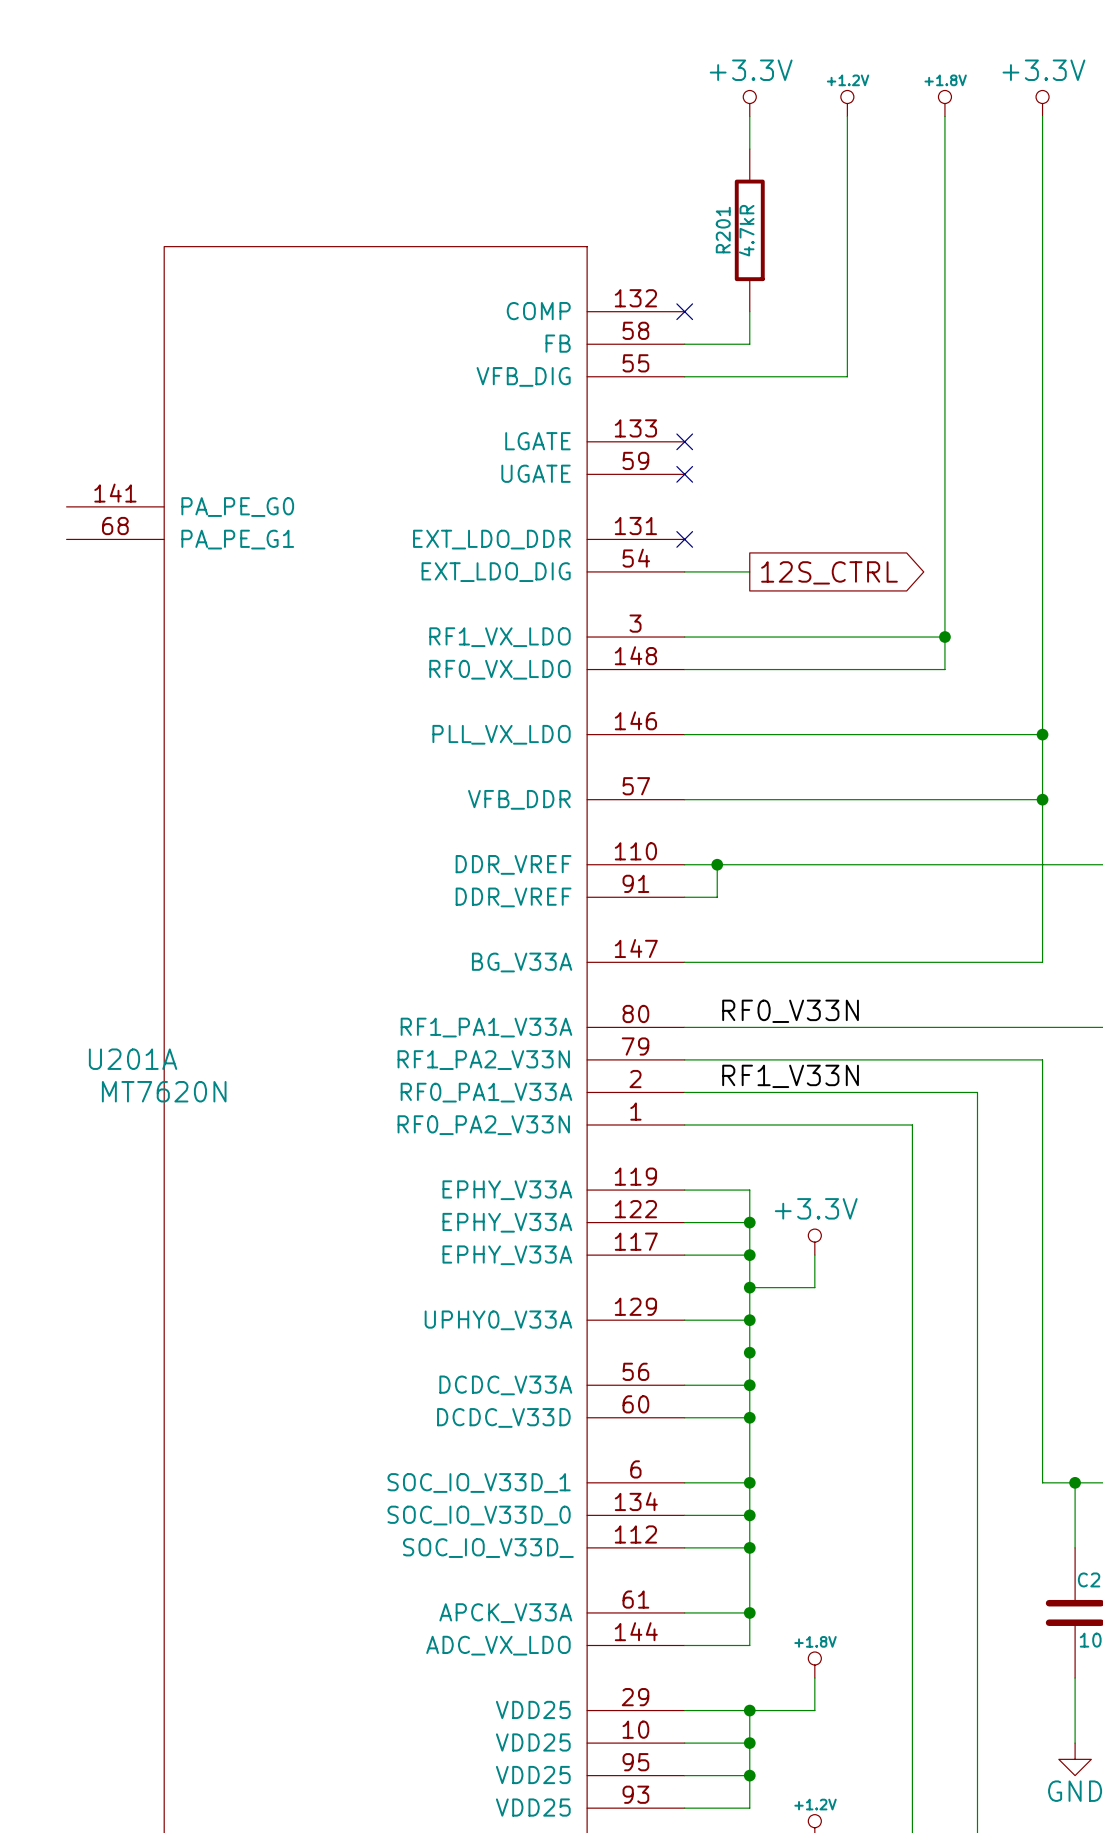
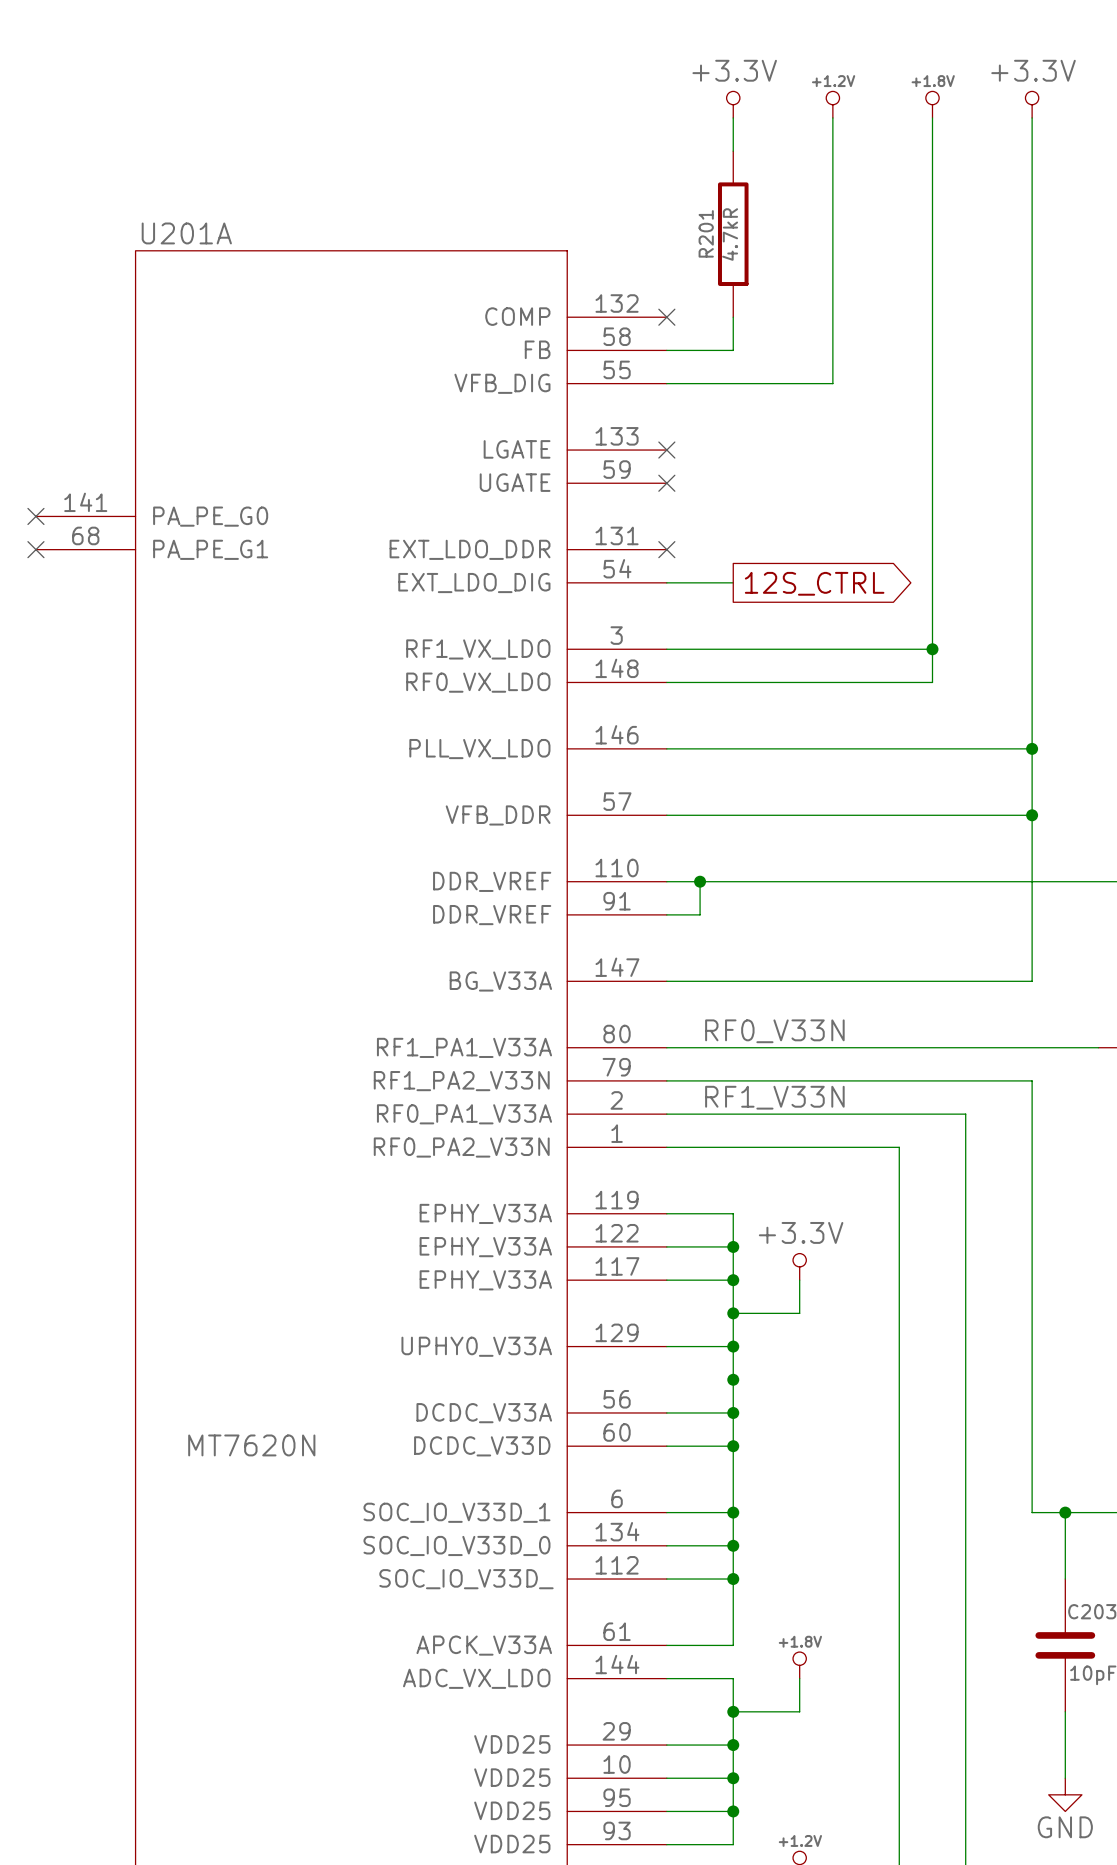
no-connect mark: none -> (35, 516)
no-connect mark: none -> (35, 549)
U201A name position: U201A (133, 1059) -> U201A (186, 233)
U201A value position: MT7620N (164, 1091) -> MT7620N (251, 1445)
wire: (749, 1612) (749, 1645) -> none
junction position: (749, 1612) -> (733, 1711)
wire: none -> (799, 1678) (799, 1711) (733, 1711)
power symbol position: +1.8V (814, 1665) -> +1.8V (799, 1665)
wire: (814, 1678) (814, 1710) (749, 1710) -> (733, 1678) (733, 1745)

